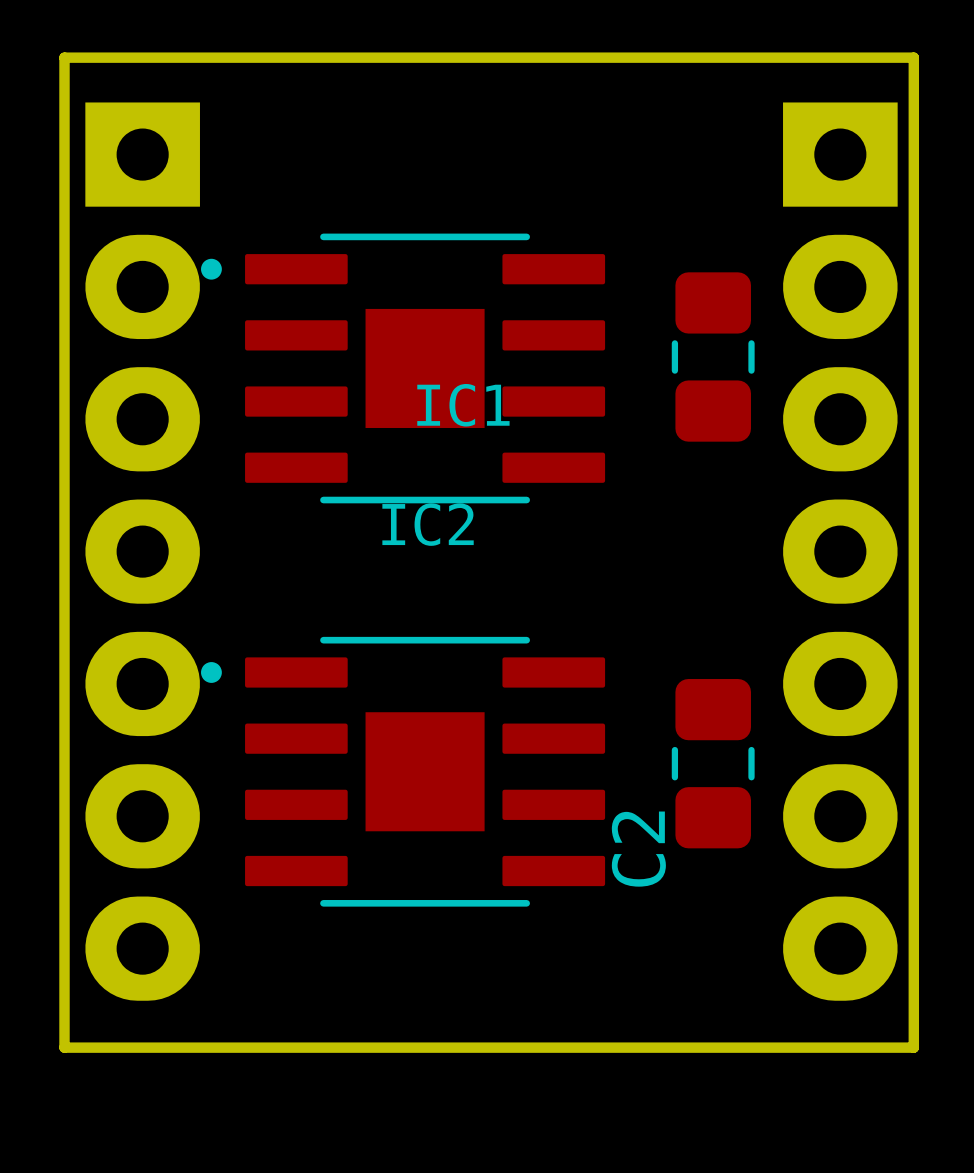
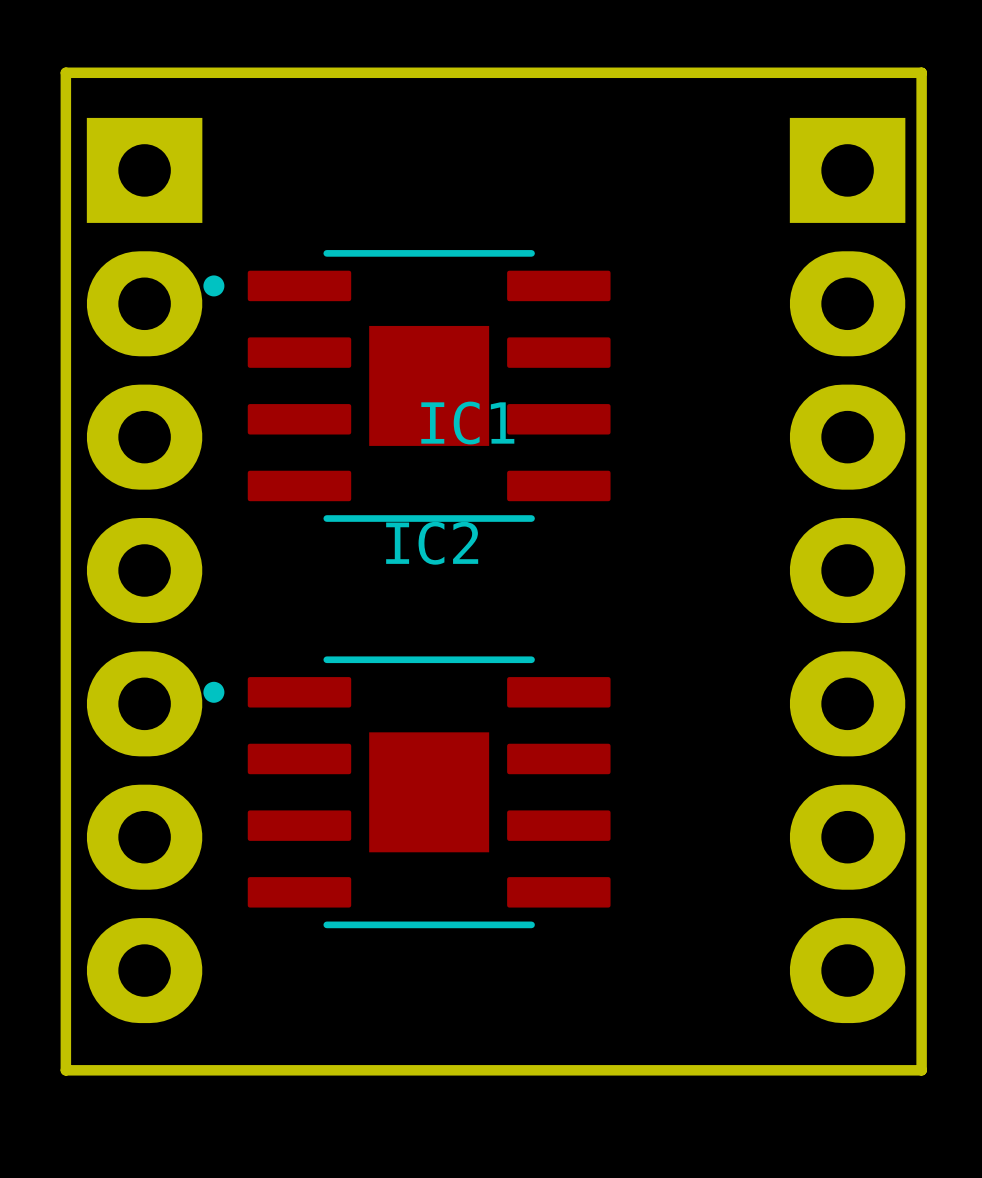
part: (713, 357) -> none
C2: (713, 763) -> none

